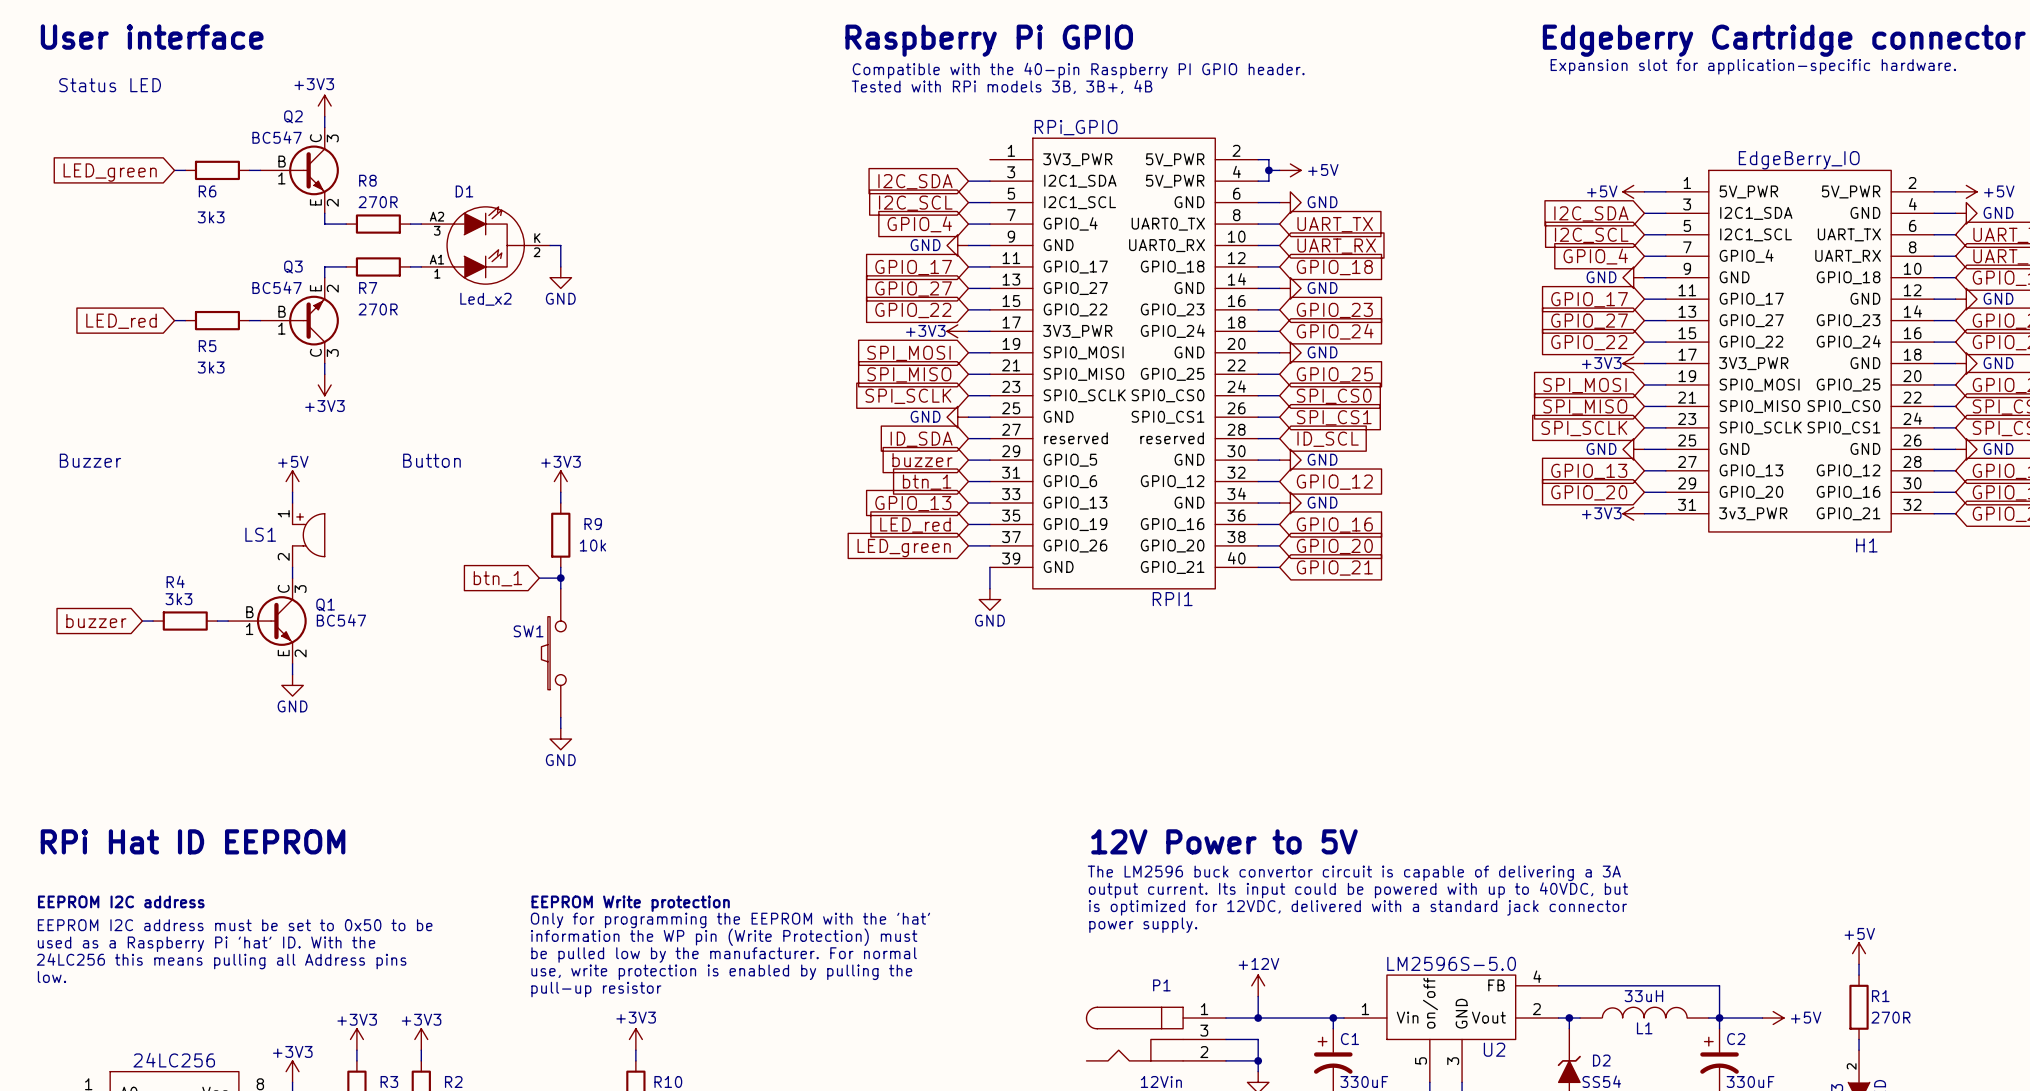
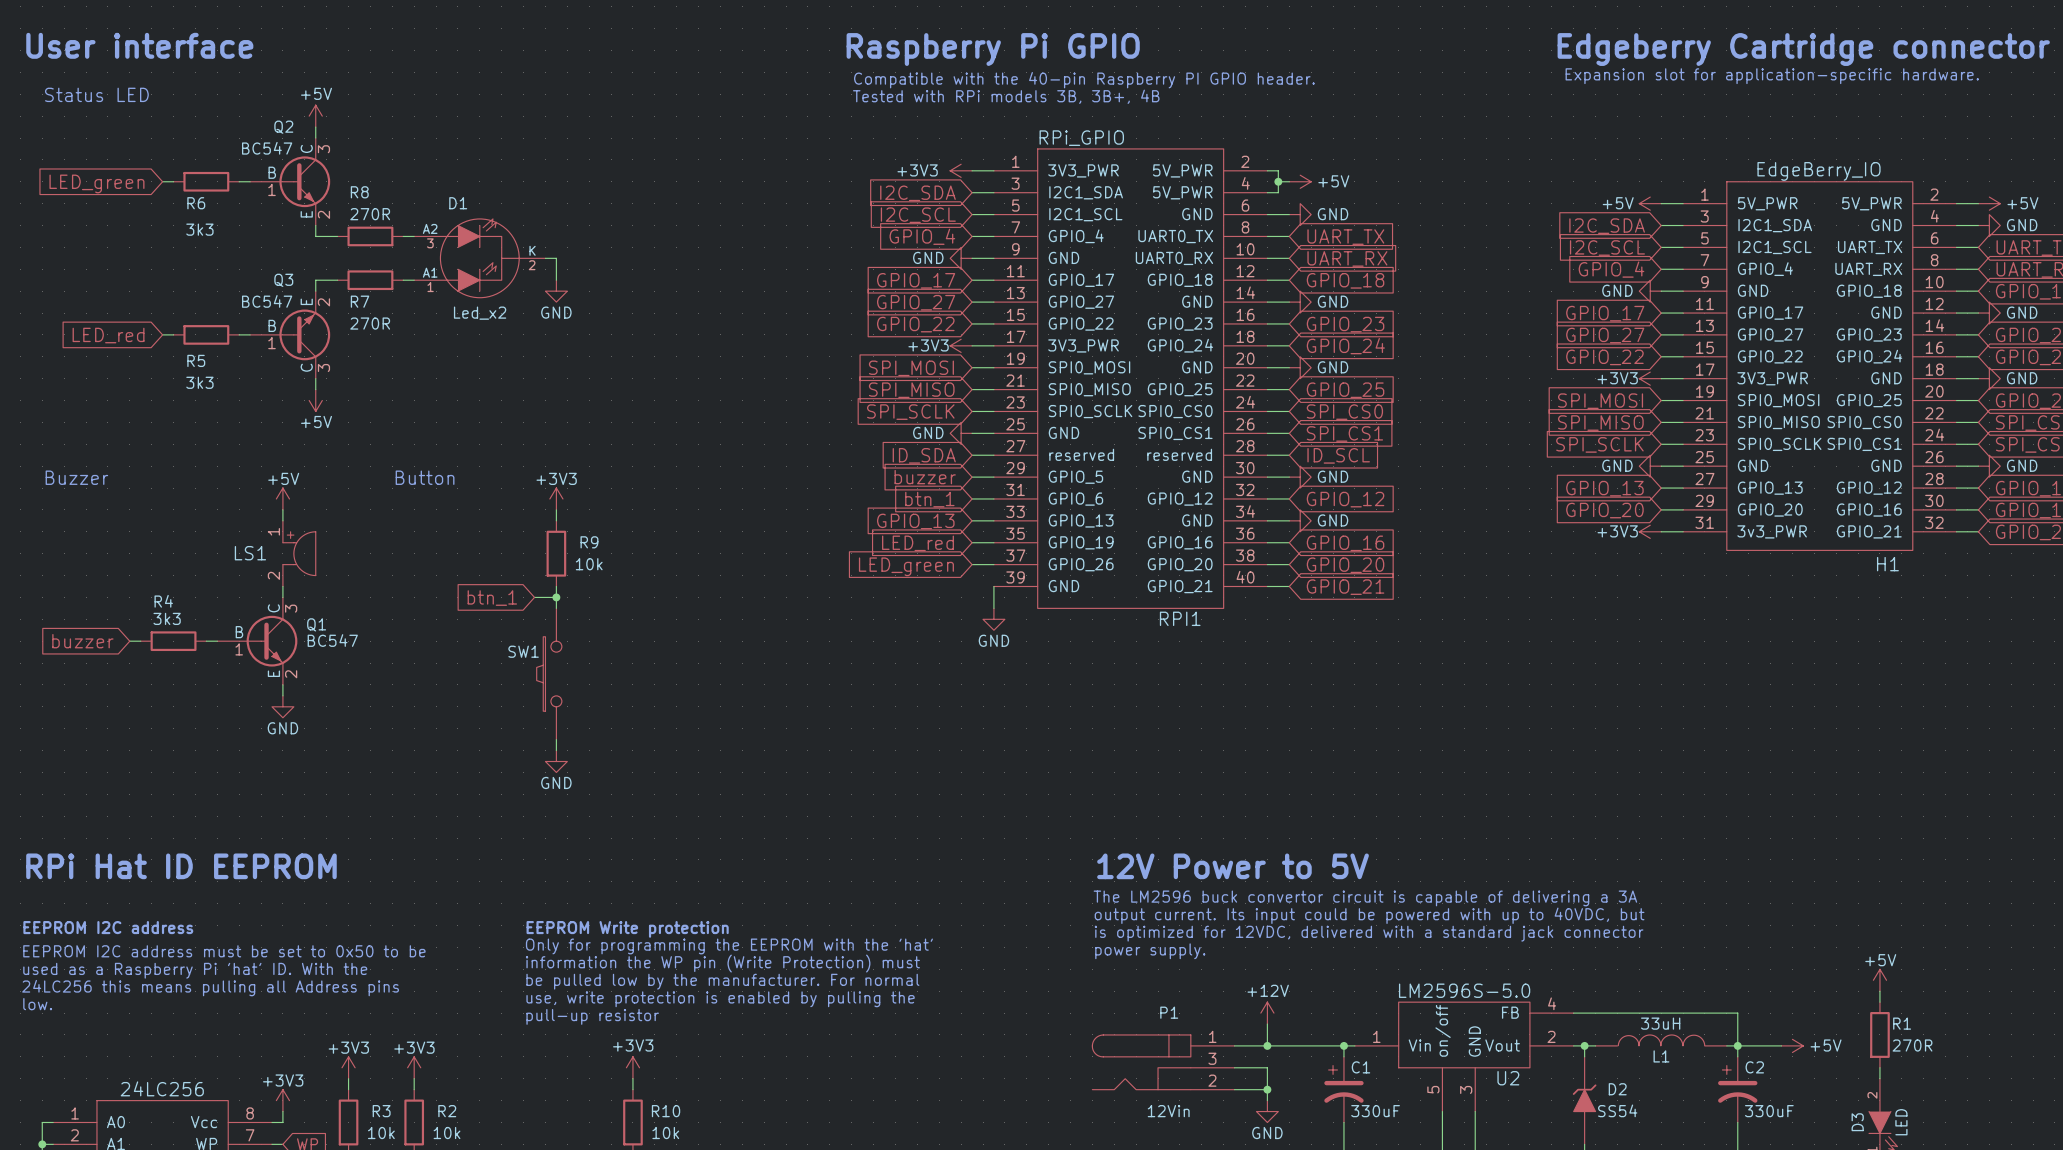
power symbol: +3V3 (324, 106) -> +5V (315, 116)
power symbol: none -> +3V3 (961, 170)
wire: none -> (972, 170) (993, 170)
power symbol: +3V3 (324, 384) -> +5V (315, 400)

